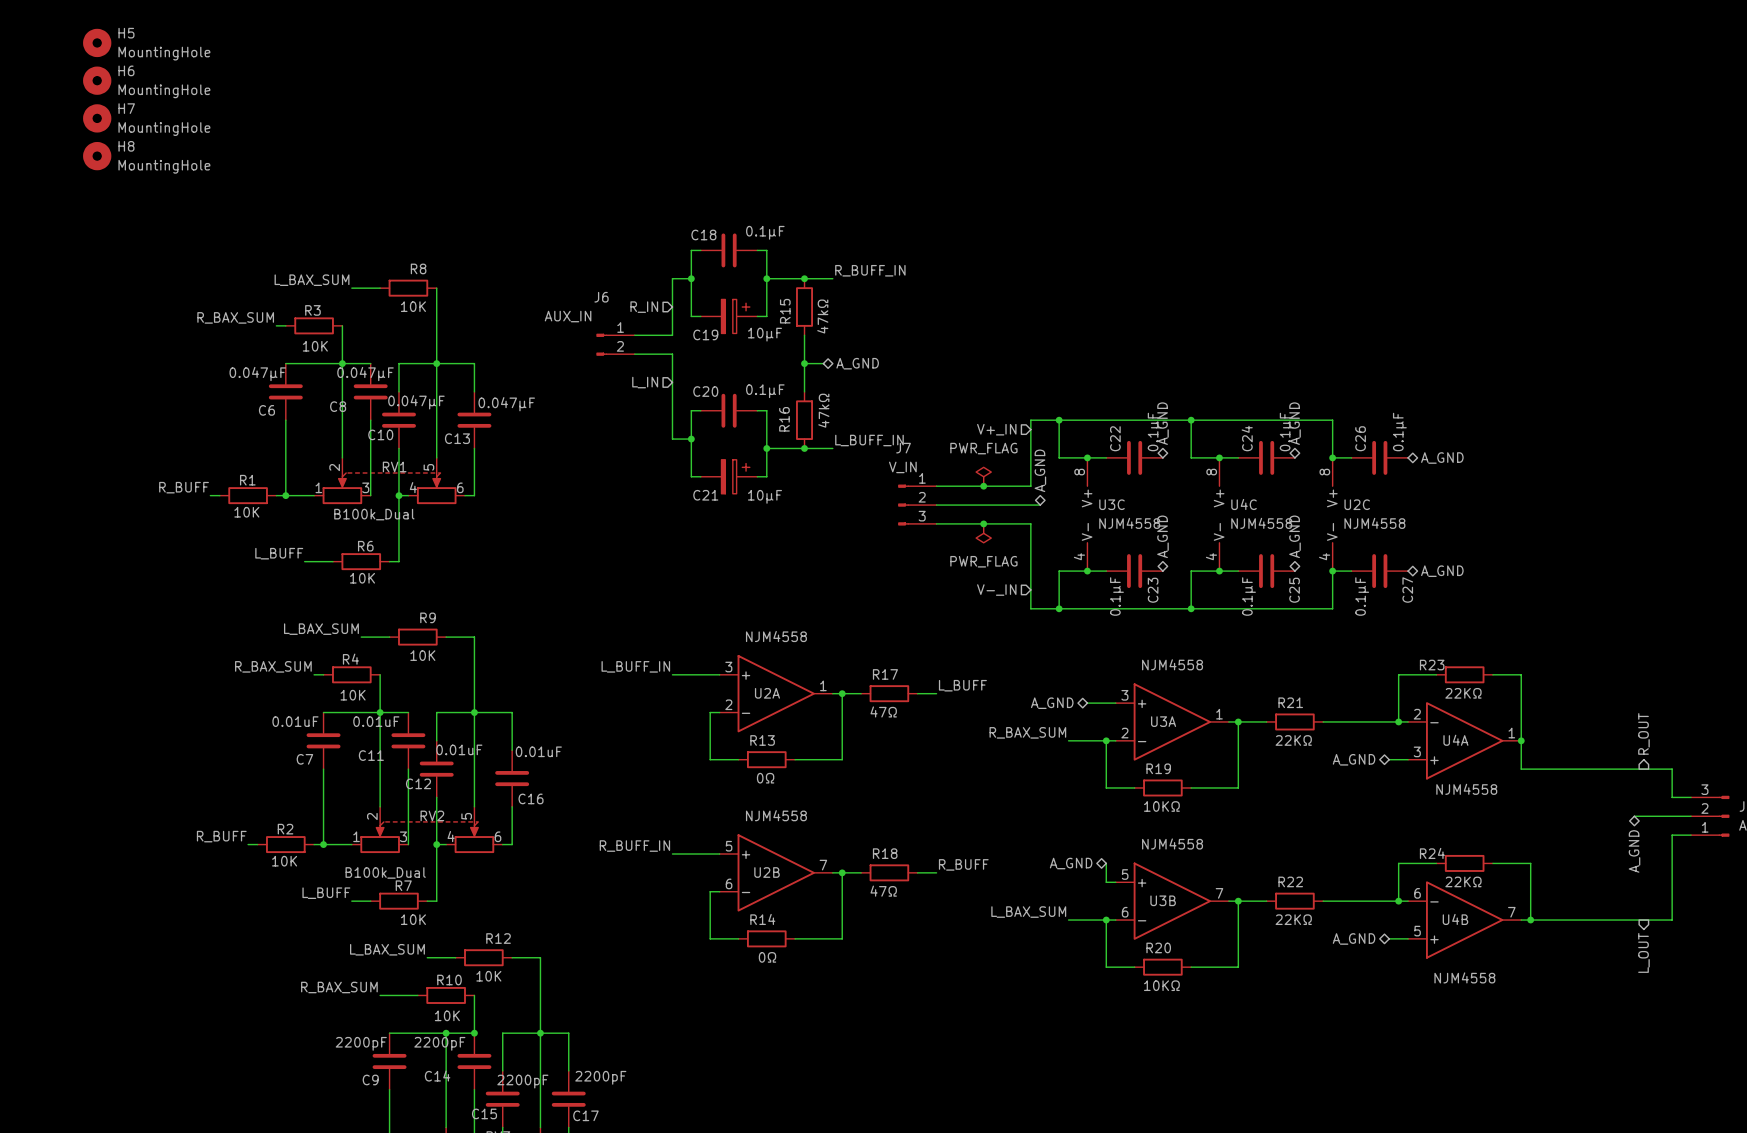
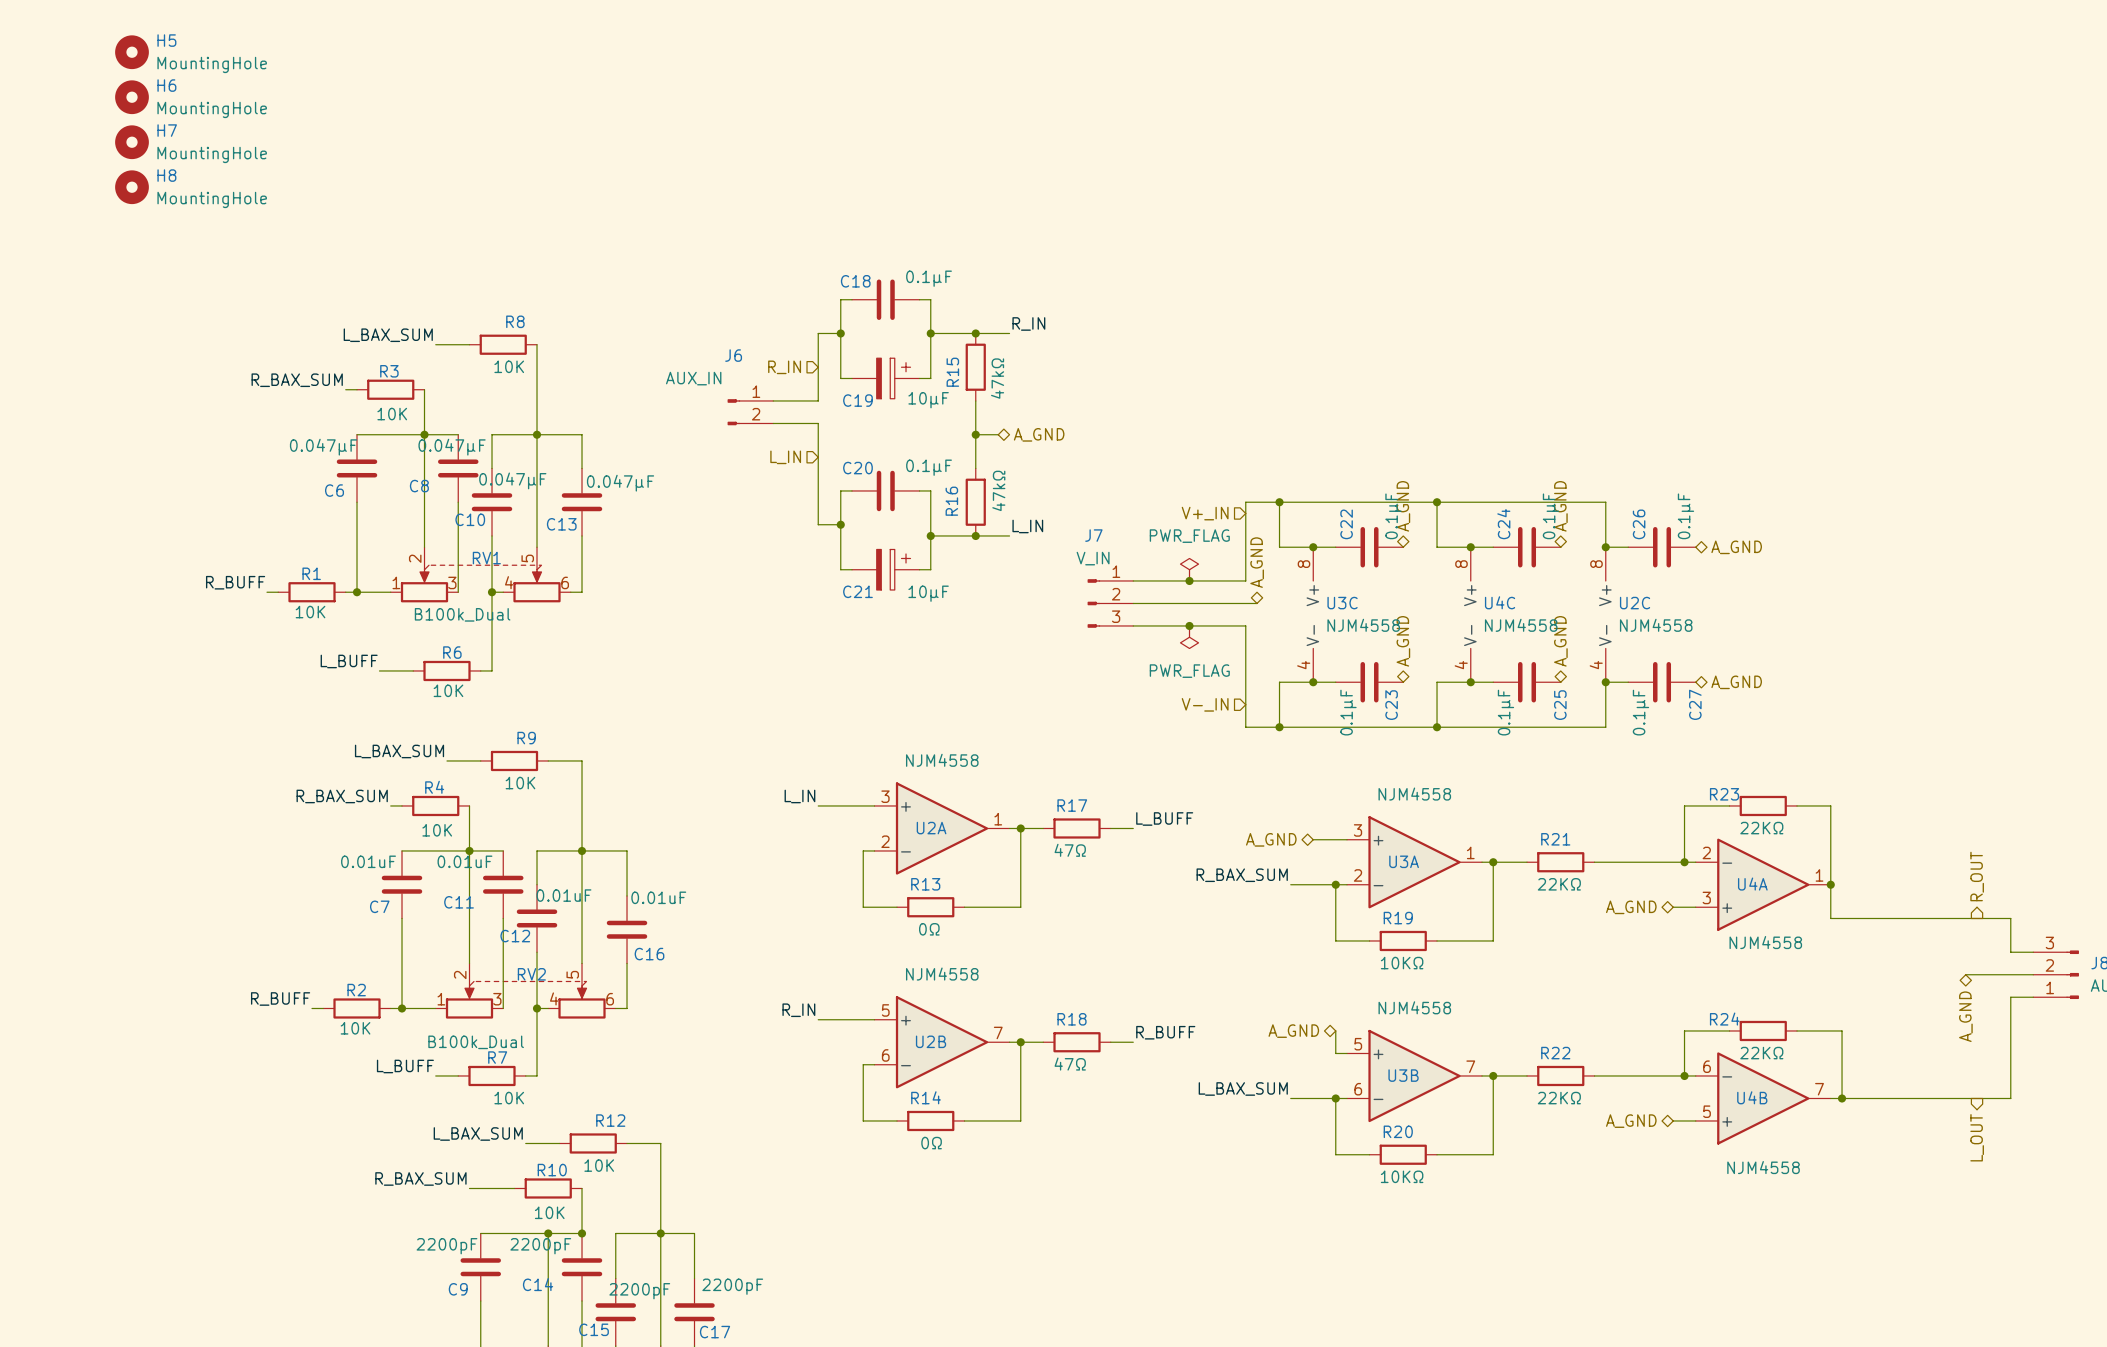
label: R_BUFF_IN (870, 270) -> R_IN (1028, 323)
label: L_BUFF_IN (869, 440) -> L_IN (1027, 526)
label: L_BUFF_IN (635, 666) -> L_IN (799, 796)
label: R_BUFF_IN (634, 846) -> R_IN (798, 1010)

